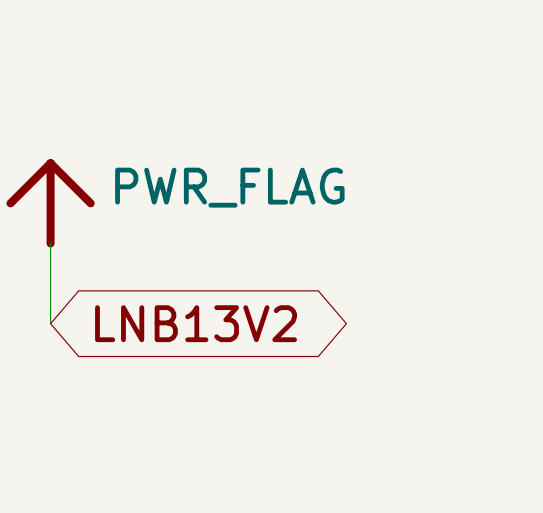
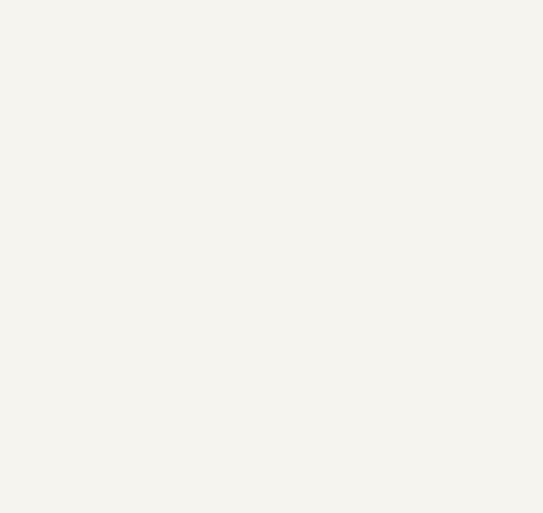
power symbol: PWR_FLAG (50, 203) -> none
wire: (50, 243) (50, 323) -> none
global label: LNB13V2 (196, 323) -> none

